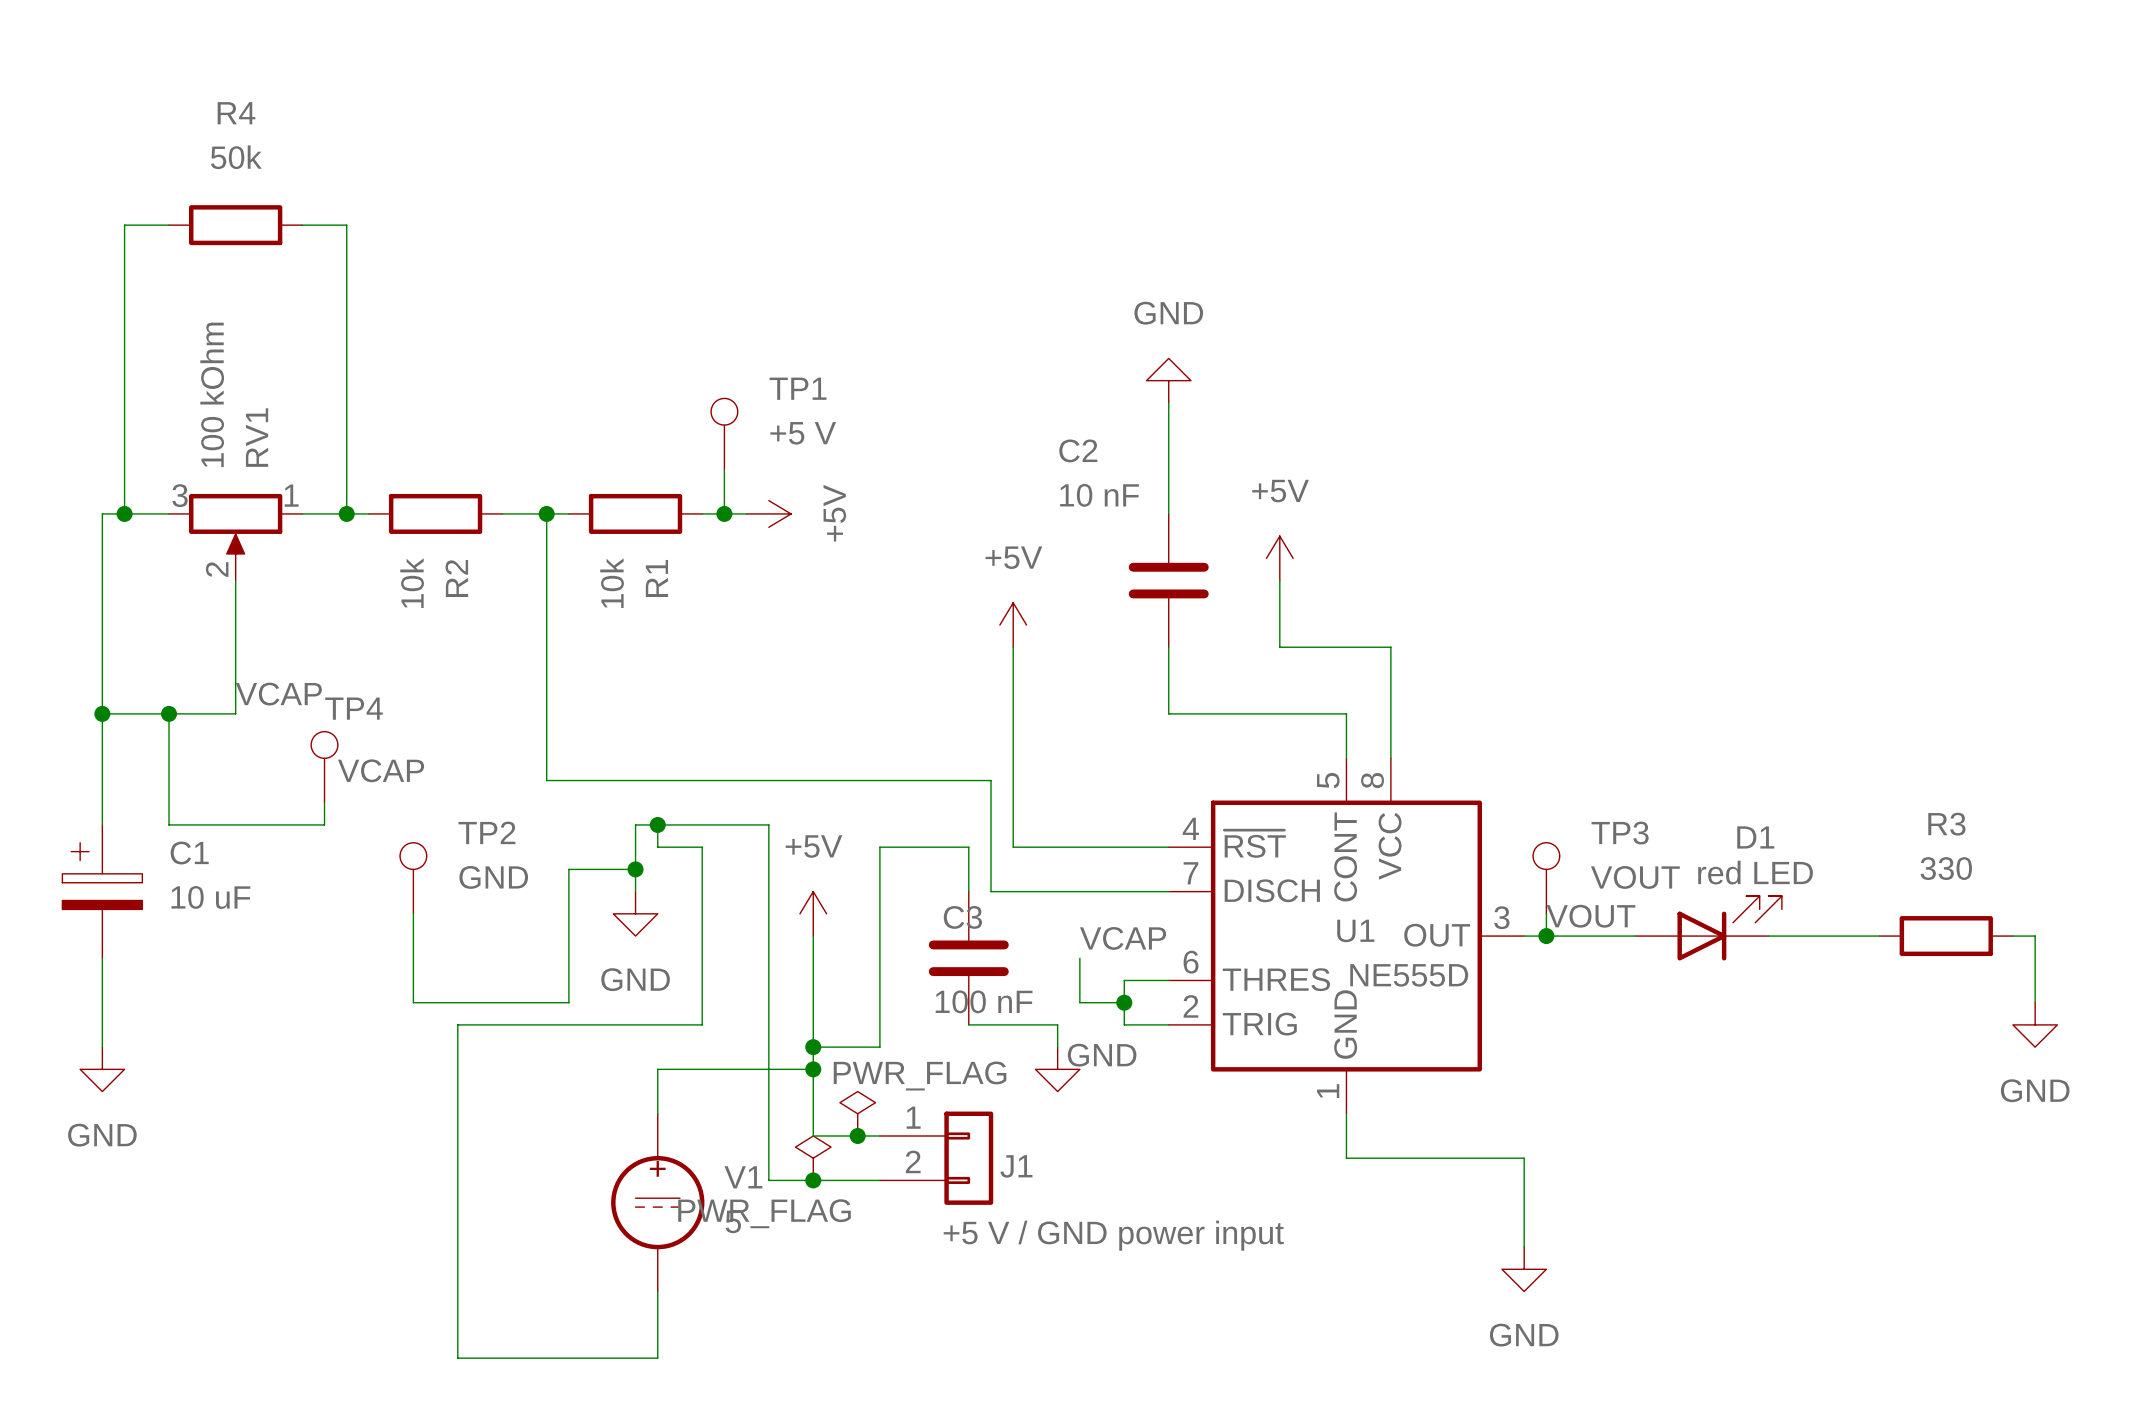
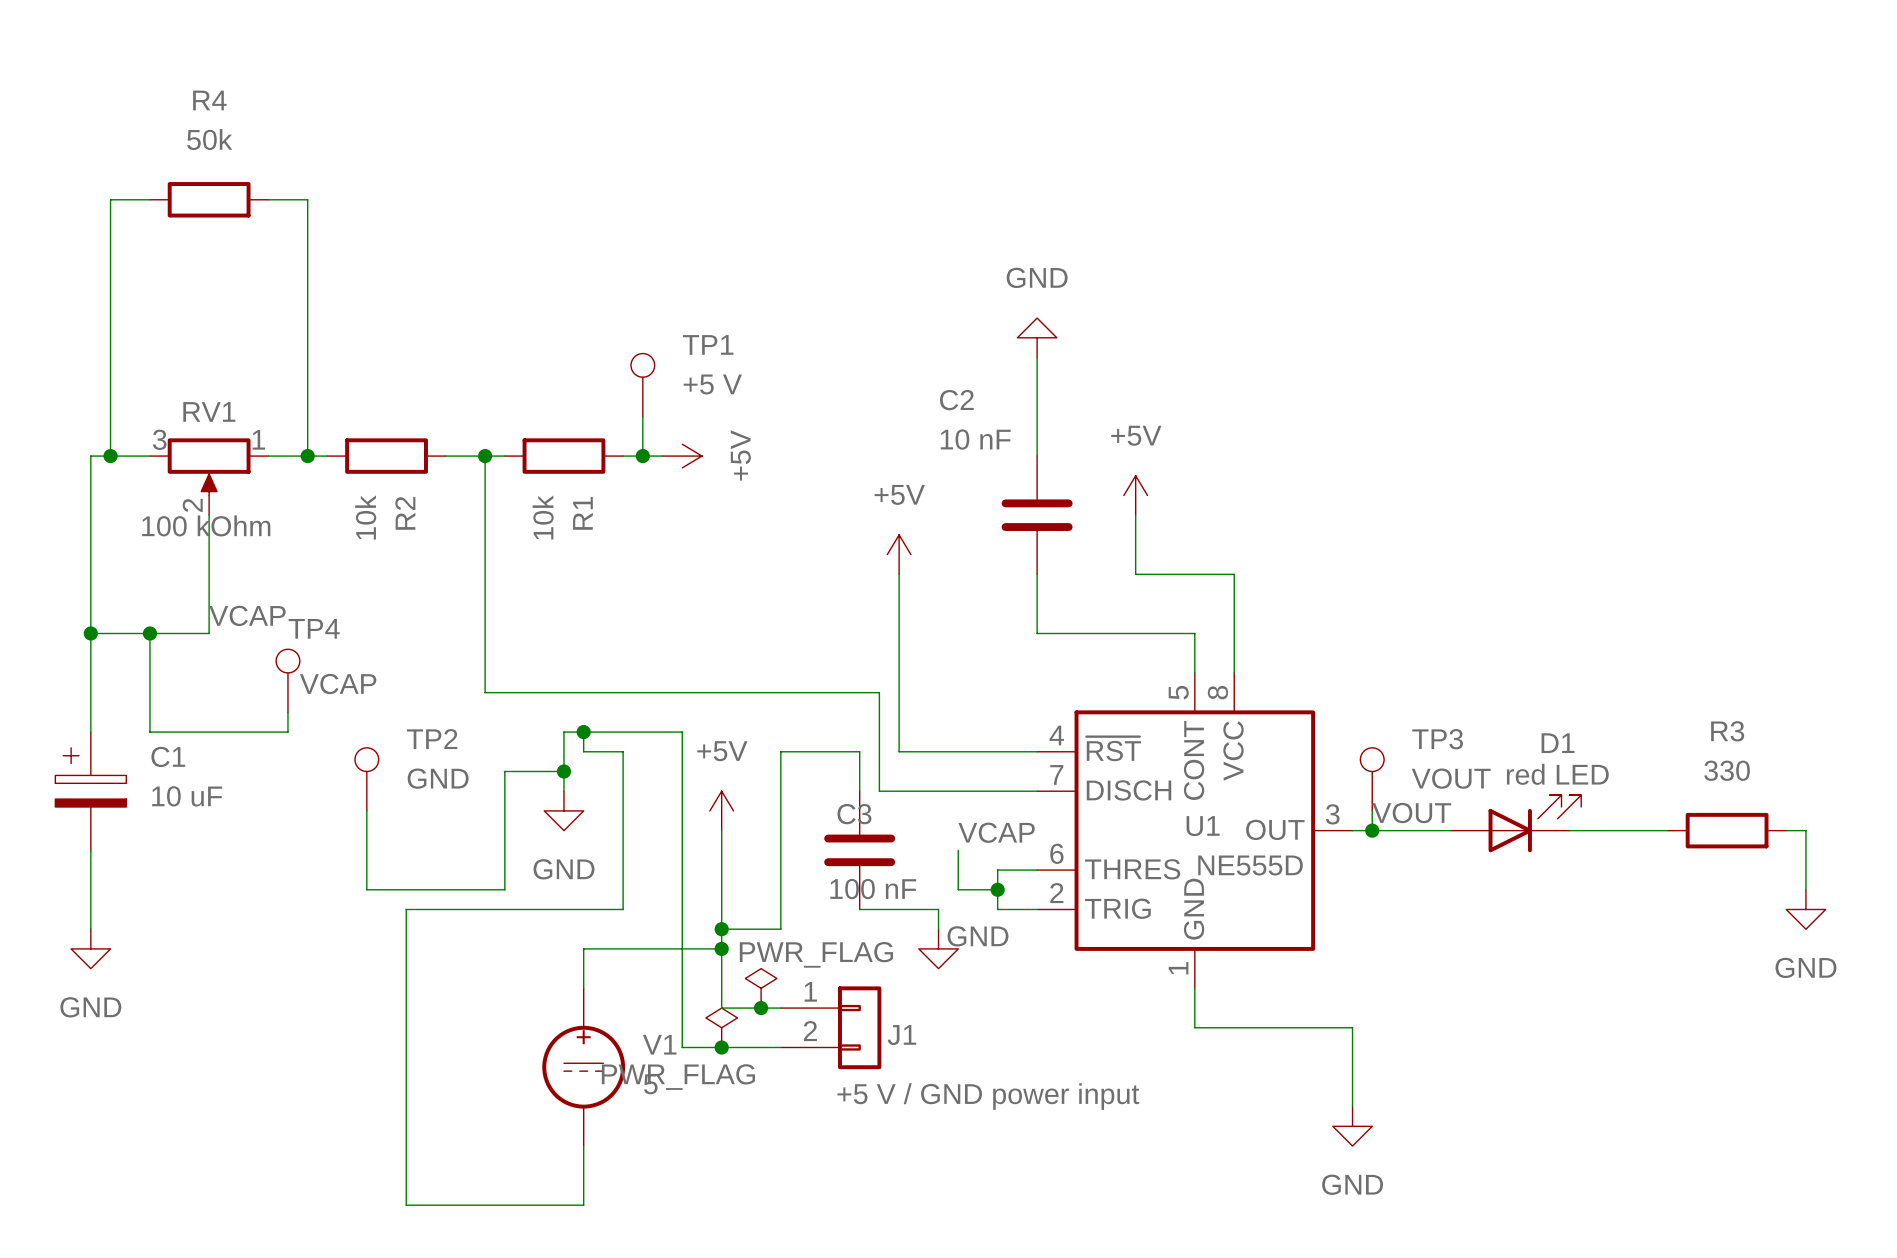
RV1 value rotation: 0° (212, 394) -> 90° clockwise (206, 525)
RV1 value position: 100 kOhm (212, 394) -> 100 kOhm (206, 525)
RV1 name rotation: 0° (257, 437) -> 90° clockwise (209, 411)

